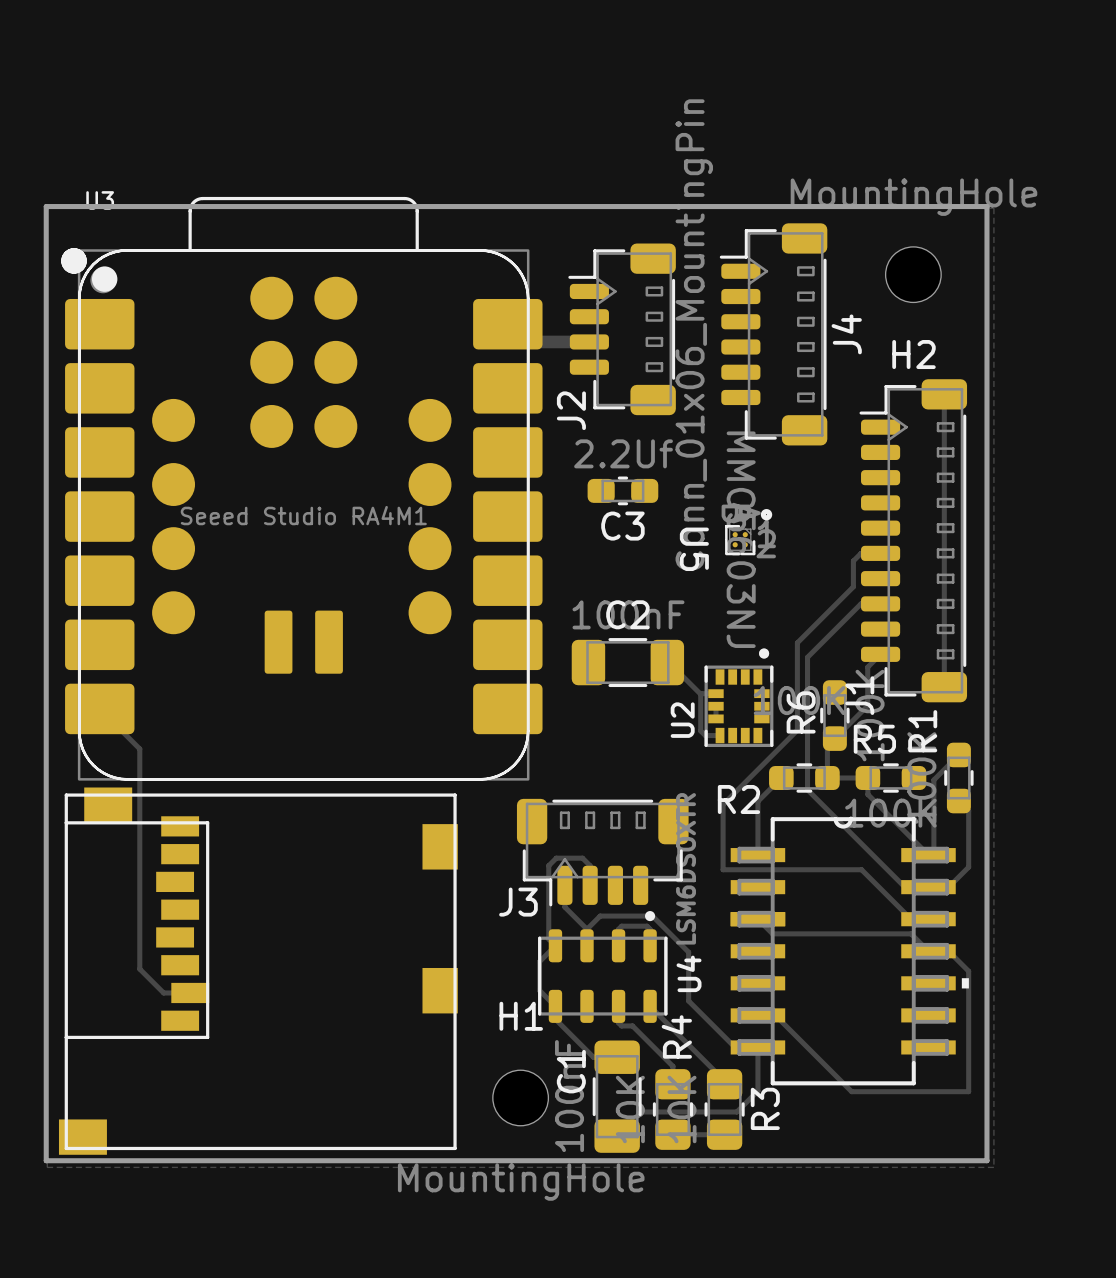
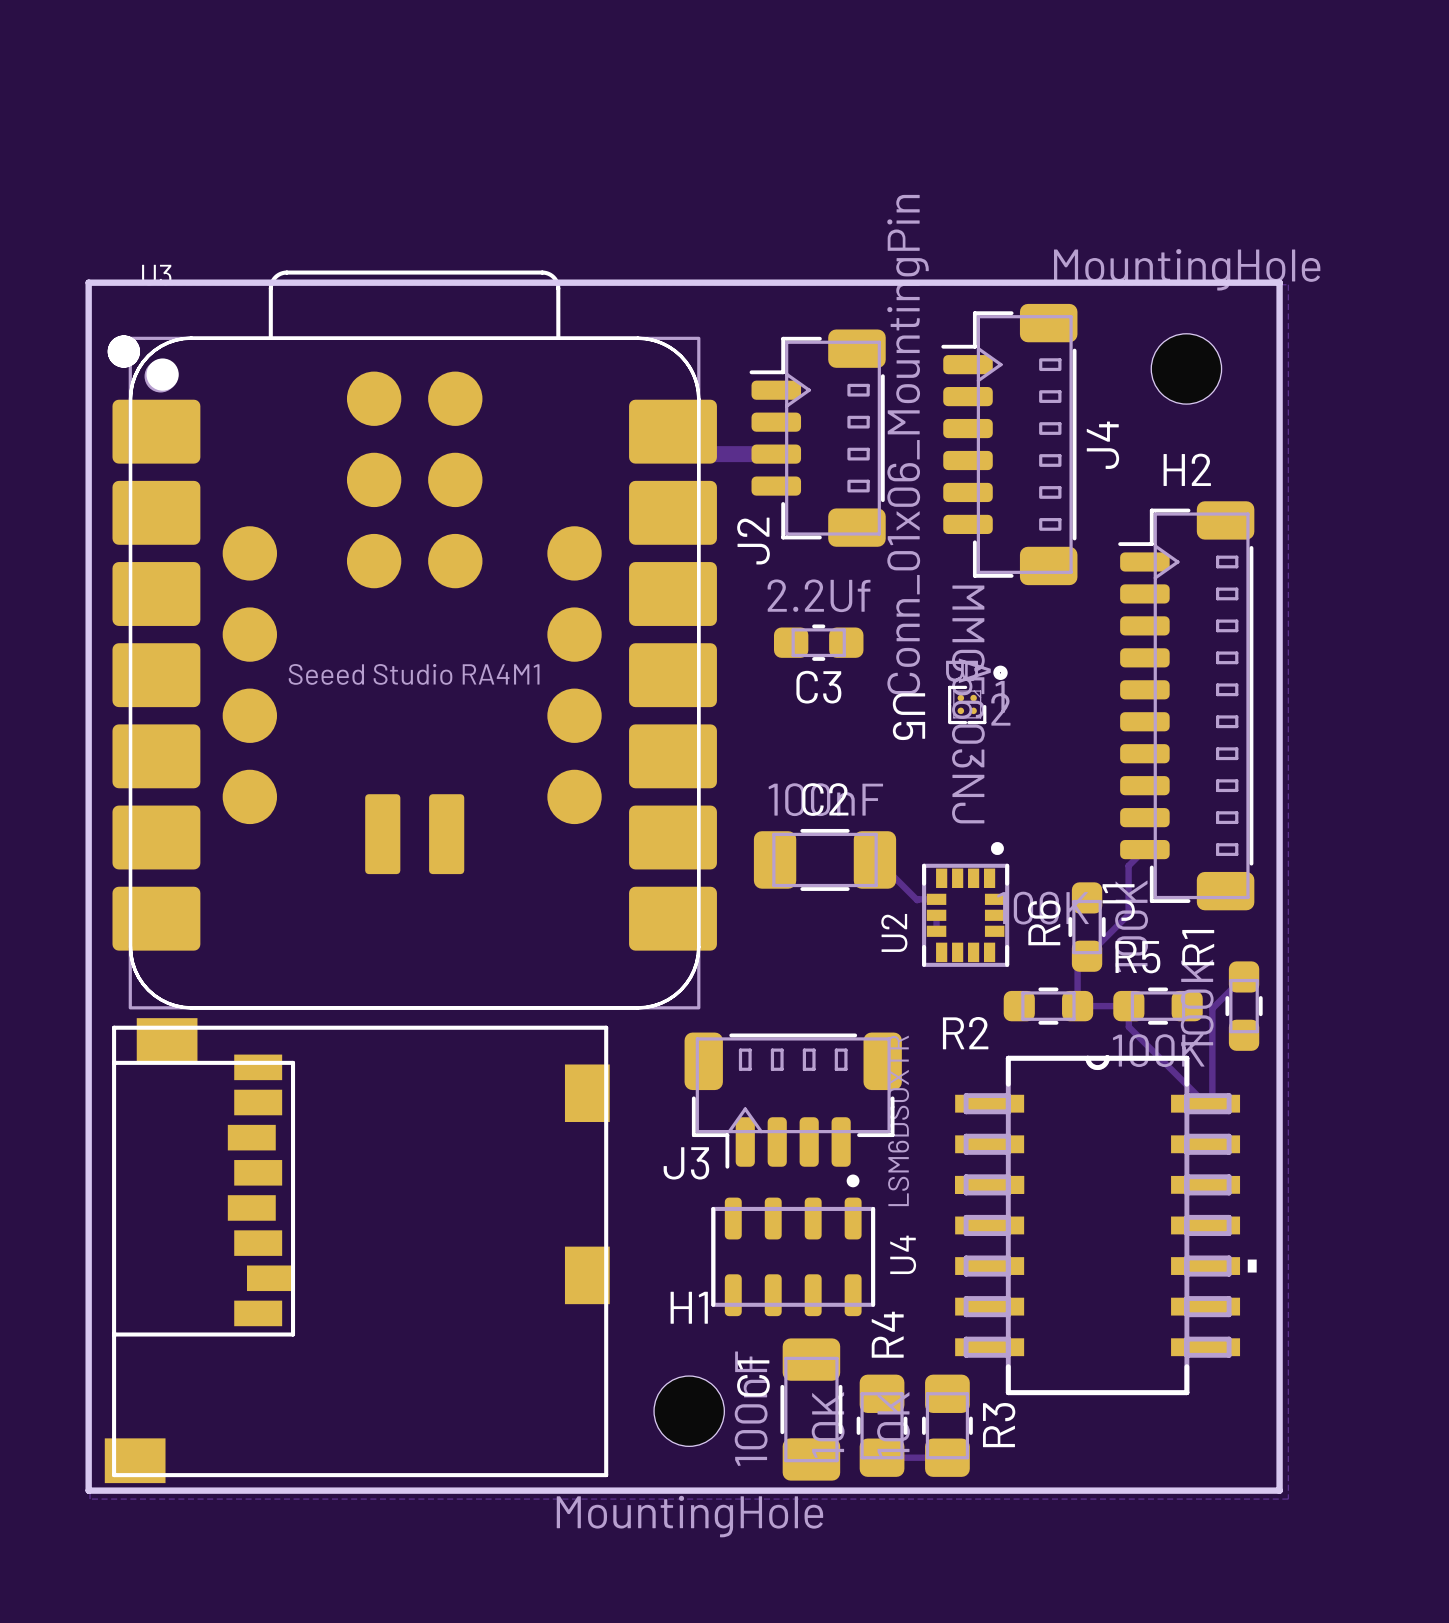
track: (944, 394) (944, 687) -> none
track: (880, 553) (861, 553) (853, 560) (853, 586) (797, 642) (797, 730) (723, 804) (723, 869) (861, 869) (911, 919) (928, 919) -> none
track: (880, 603) (861, 603) (807, 657) (807, 789) (904, 887) (948, 887) (968, 867) (968, 810) (958, 801) -> none
track: (700, 694) (700, 730) (705, 735) (720, 735) -> none
track: (99, 708) (139, 748) (139, 969) (163, 992) (190, 992) -> none
track: (781, 778) (757, 801) (757, 855) -> none
track: (564, 885) (564, 907) (587, 929) -> none
track: (590, 885) (590, 865) (582, 858) (556, 858) (548, 865) (548, 939) (555, 945) (539, 961) (539, 990) (555, 1006) -> none
track: (778, 919) (757, 919) (772, 933) (911, 933) (928, 951) (948, 951) (968, 971) (968, 1091) (851, 1091) (775, 1015) -> none
track: (587, 929) (600, 916) (652, 916) (688, 952) (688, 1000) (735, 1047) (757, 1047) (757, 1090) (736, 1111) (641, 1111) (617, 1136) -> none
track: (618, 945) (618, 929) (621, 926) (647, 926) (650, 929) (650, 945) -> none
track: (552, 1003) (552, 1016) (593, 1057) (617, 1057) -> none
track: (618, 1006) (618, 1022) (621, 1025) (632, 1025) (672, 1066) (672, 1084) -> none
track: (650, 1006) (724, 1080) (724, 1084) -> none

